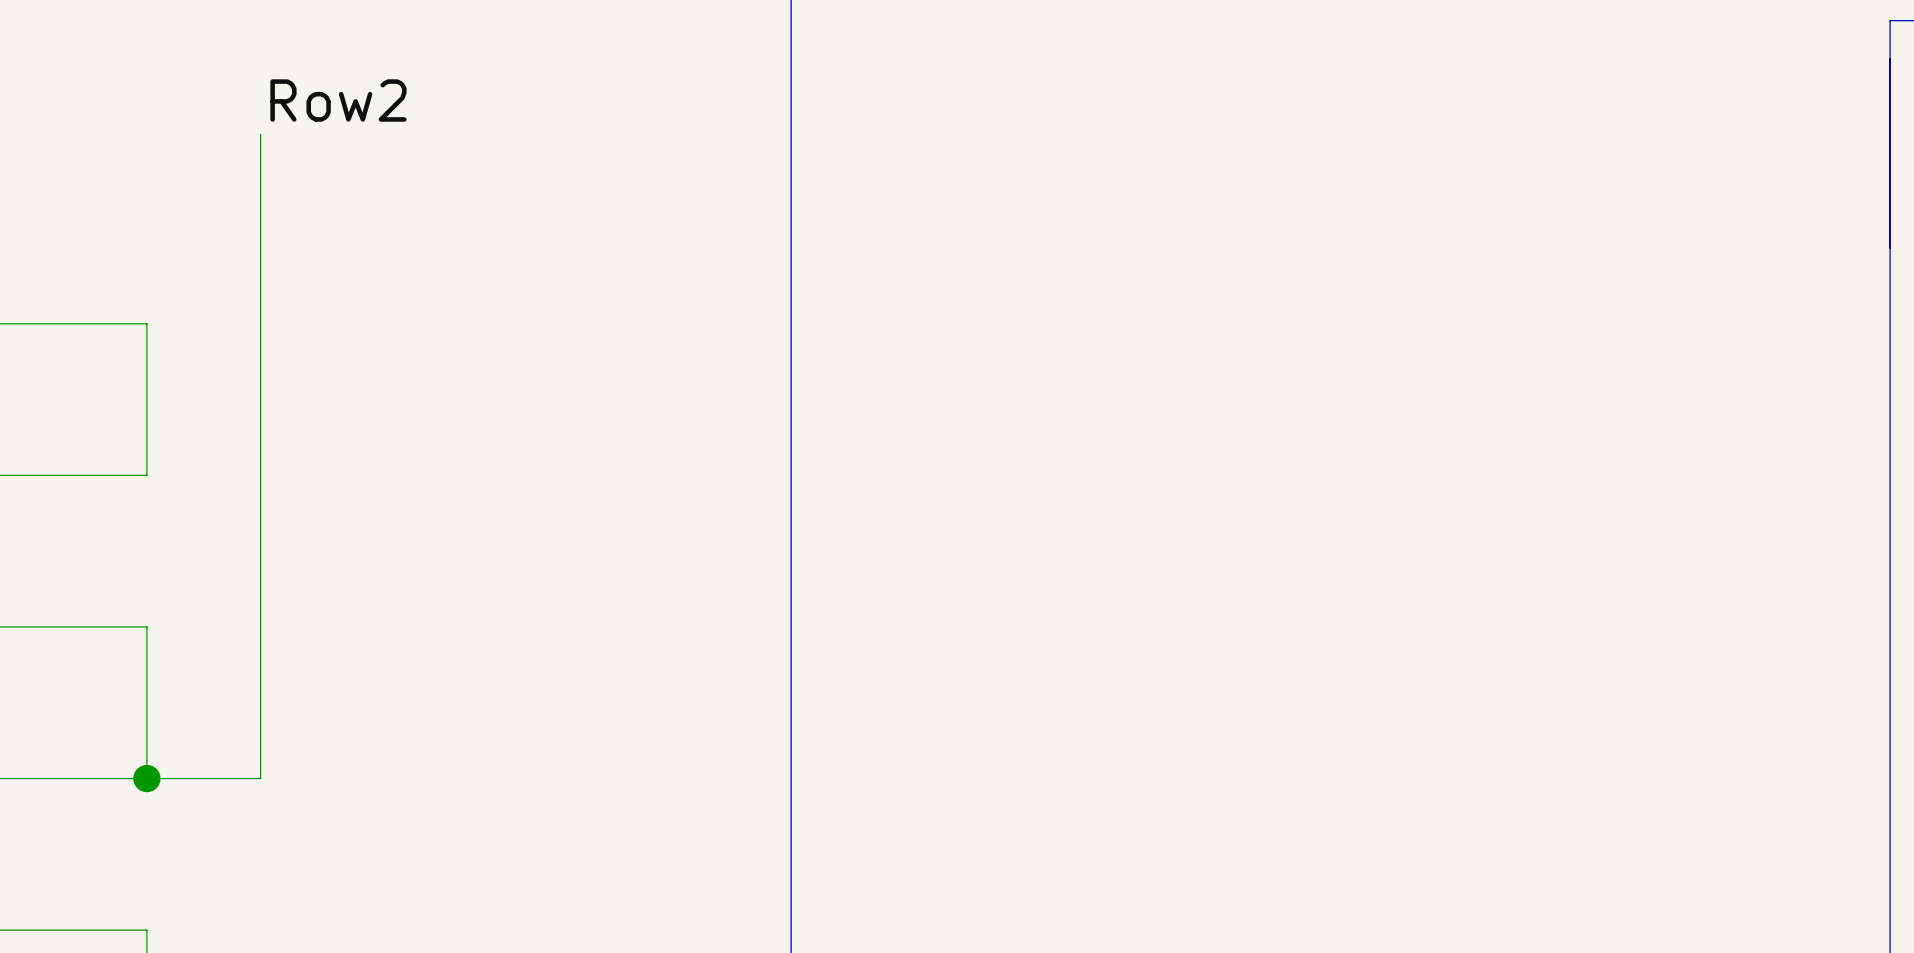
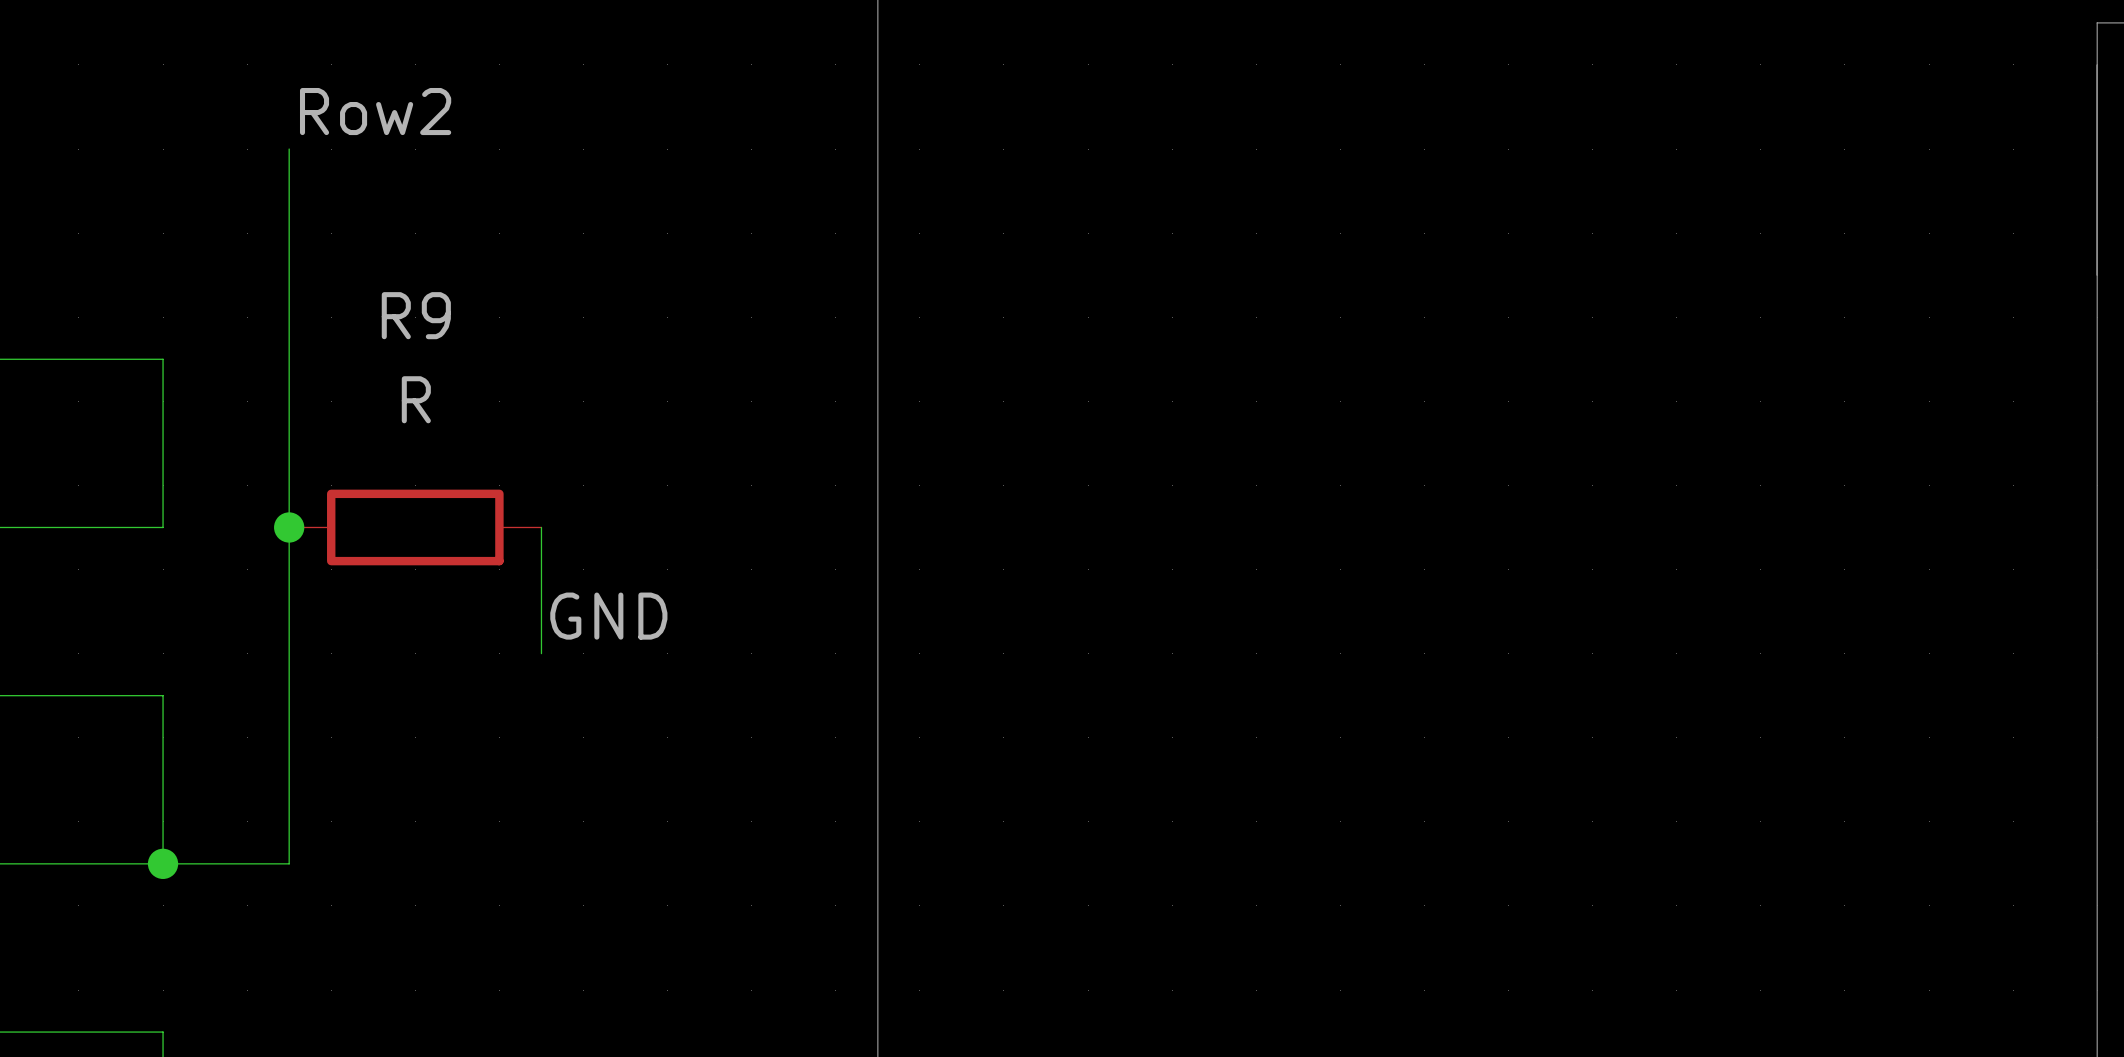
junction: none -> (289, 527)
R9: none -> R (415, 527)
wire: none -> (541, 527) (541, 653)
label: none -> GND (608, 616)

